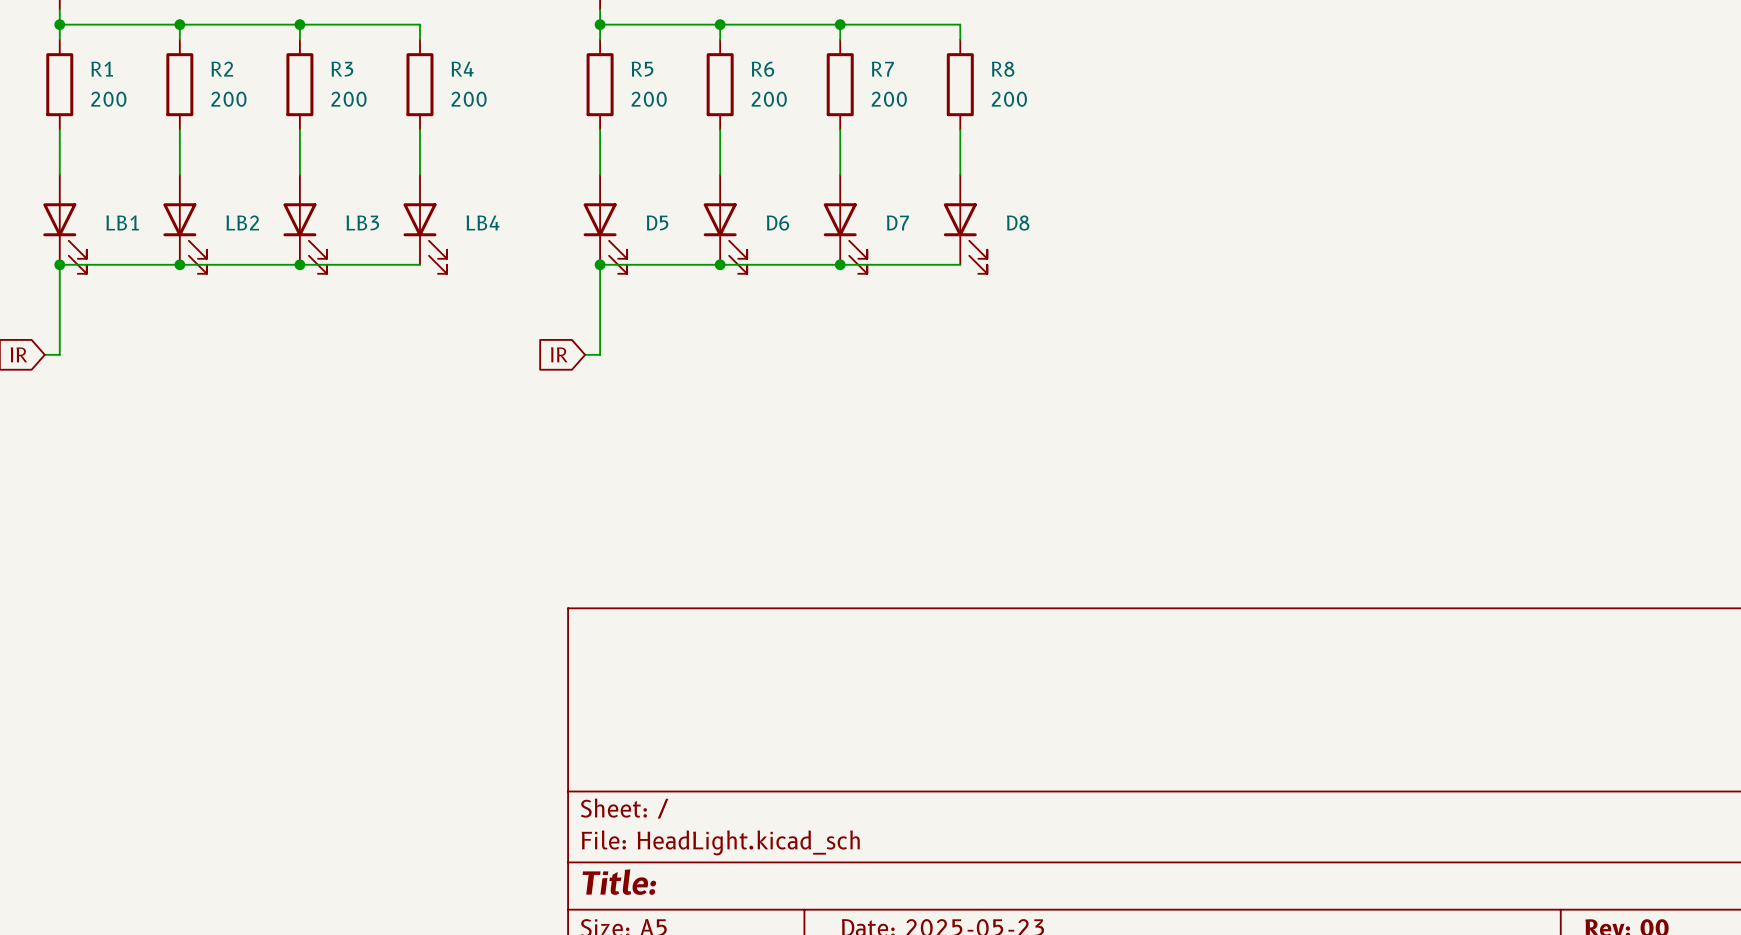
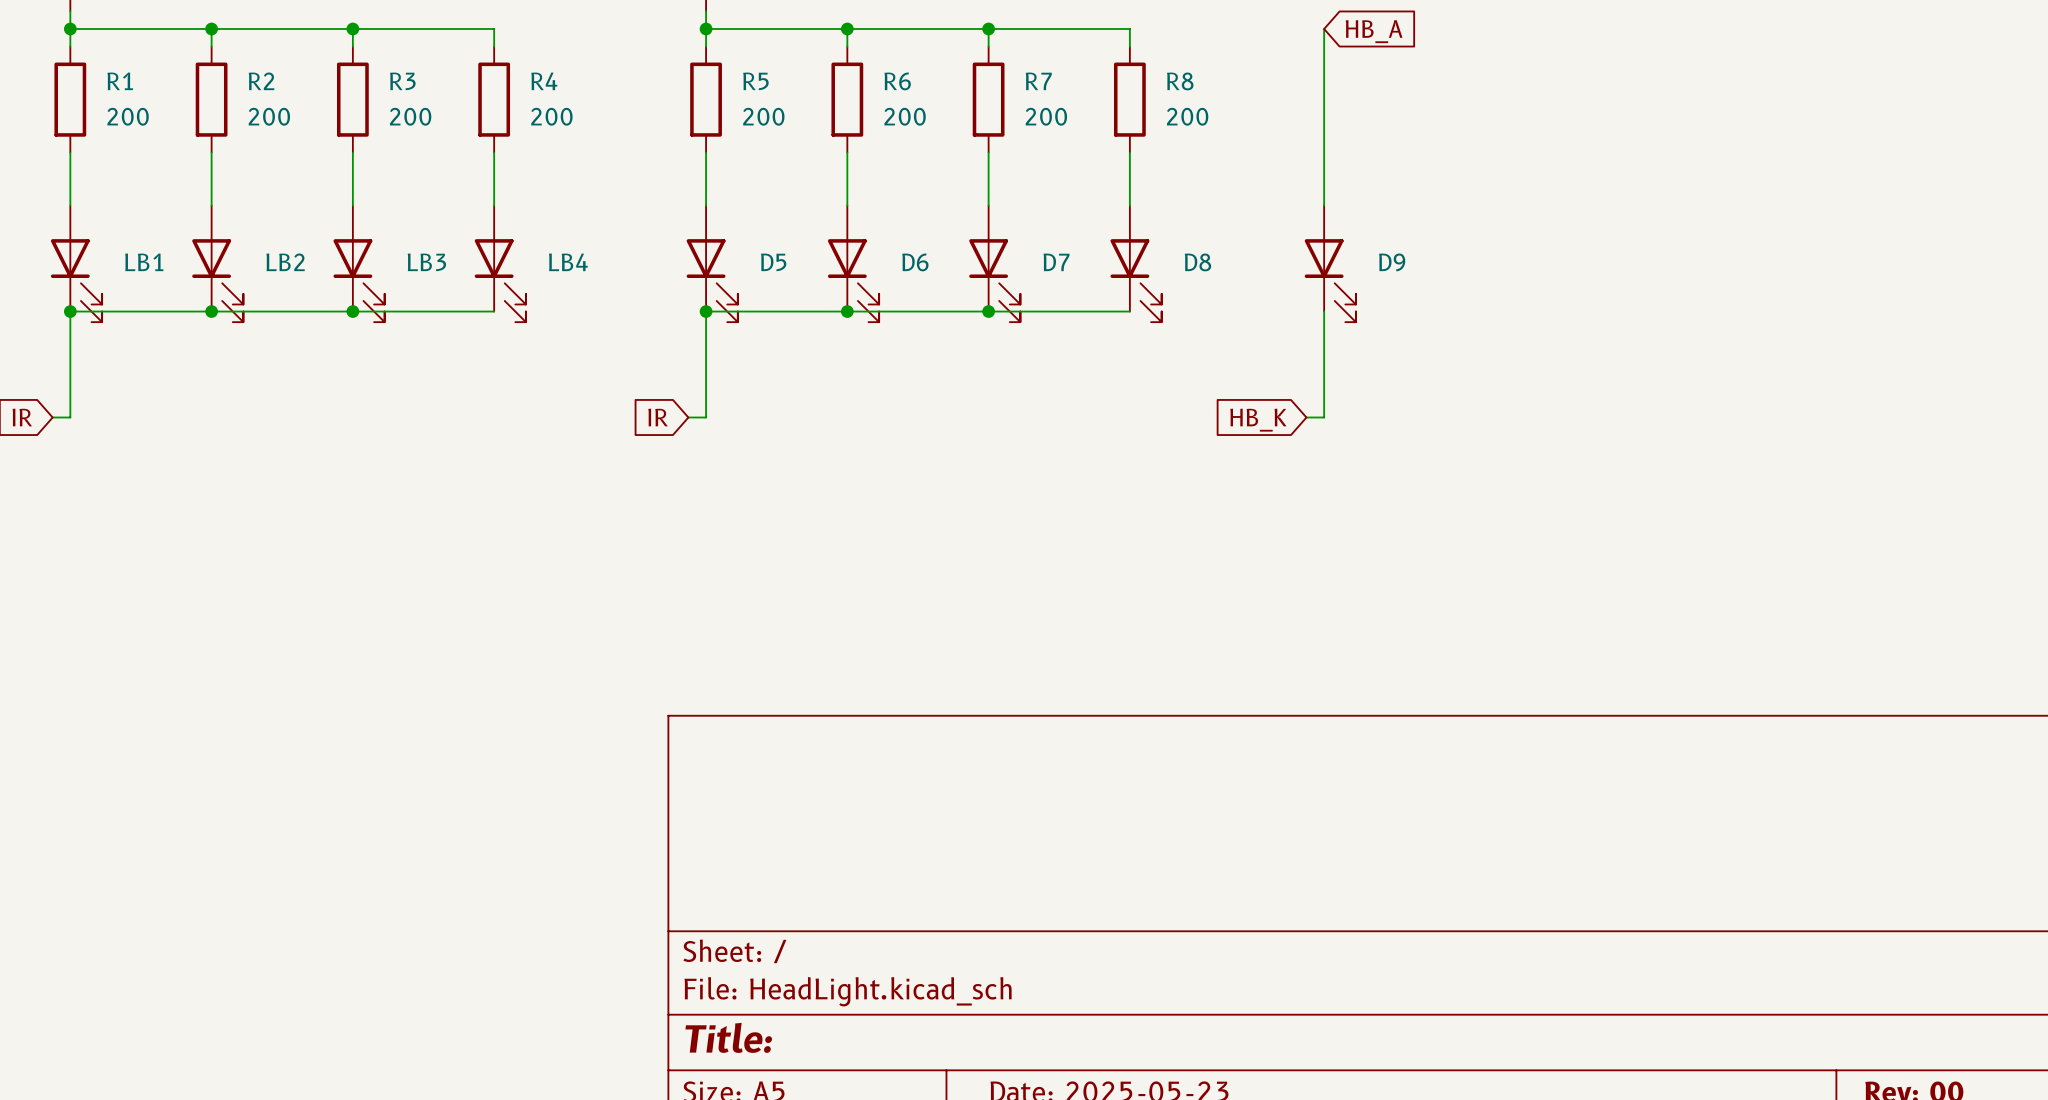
wire: none -> (1324, 28) (1324, 205)
global label: none -> HB_A (1374, 31)
D9: none -> (1330, 263)
wire: none -> (1324, 311) (1324, 417) (1306, 417)
global label: none -> HB_K (1258, 420)

